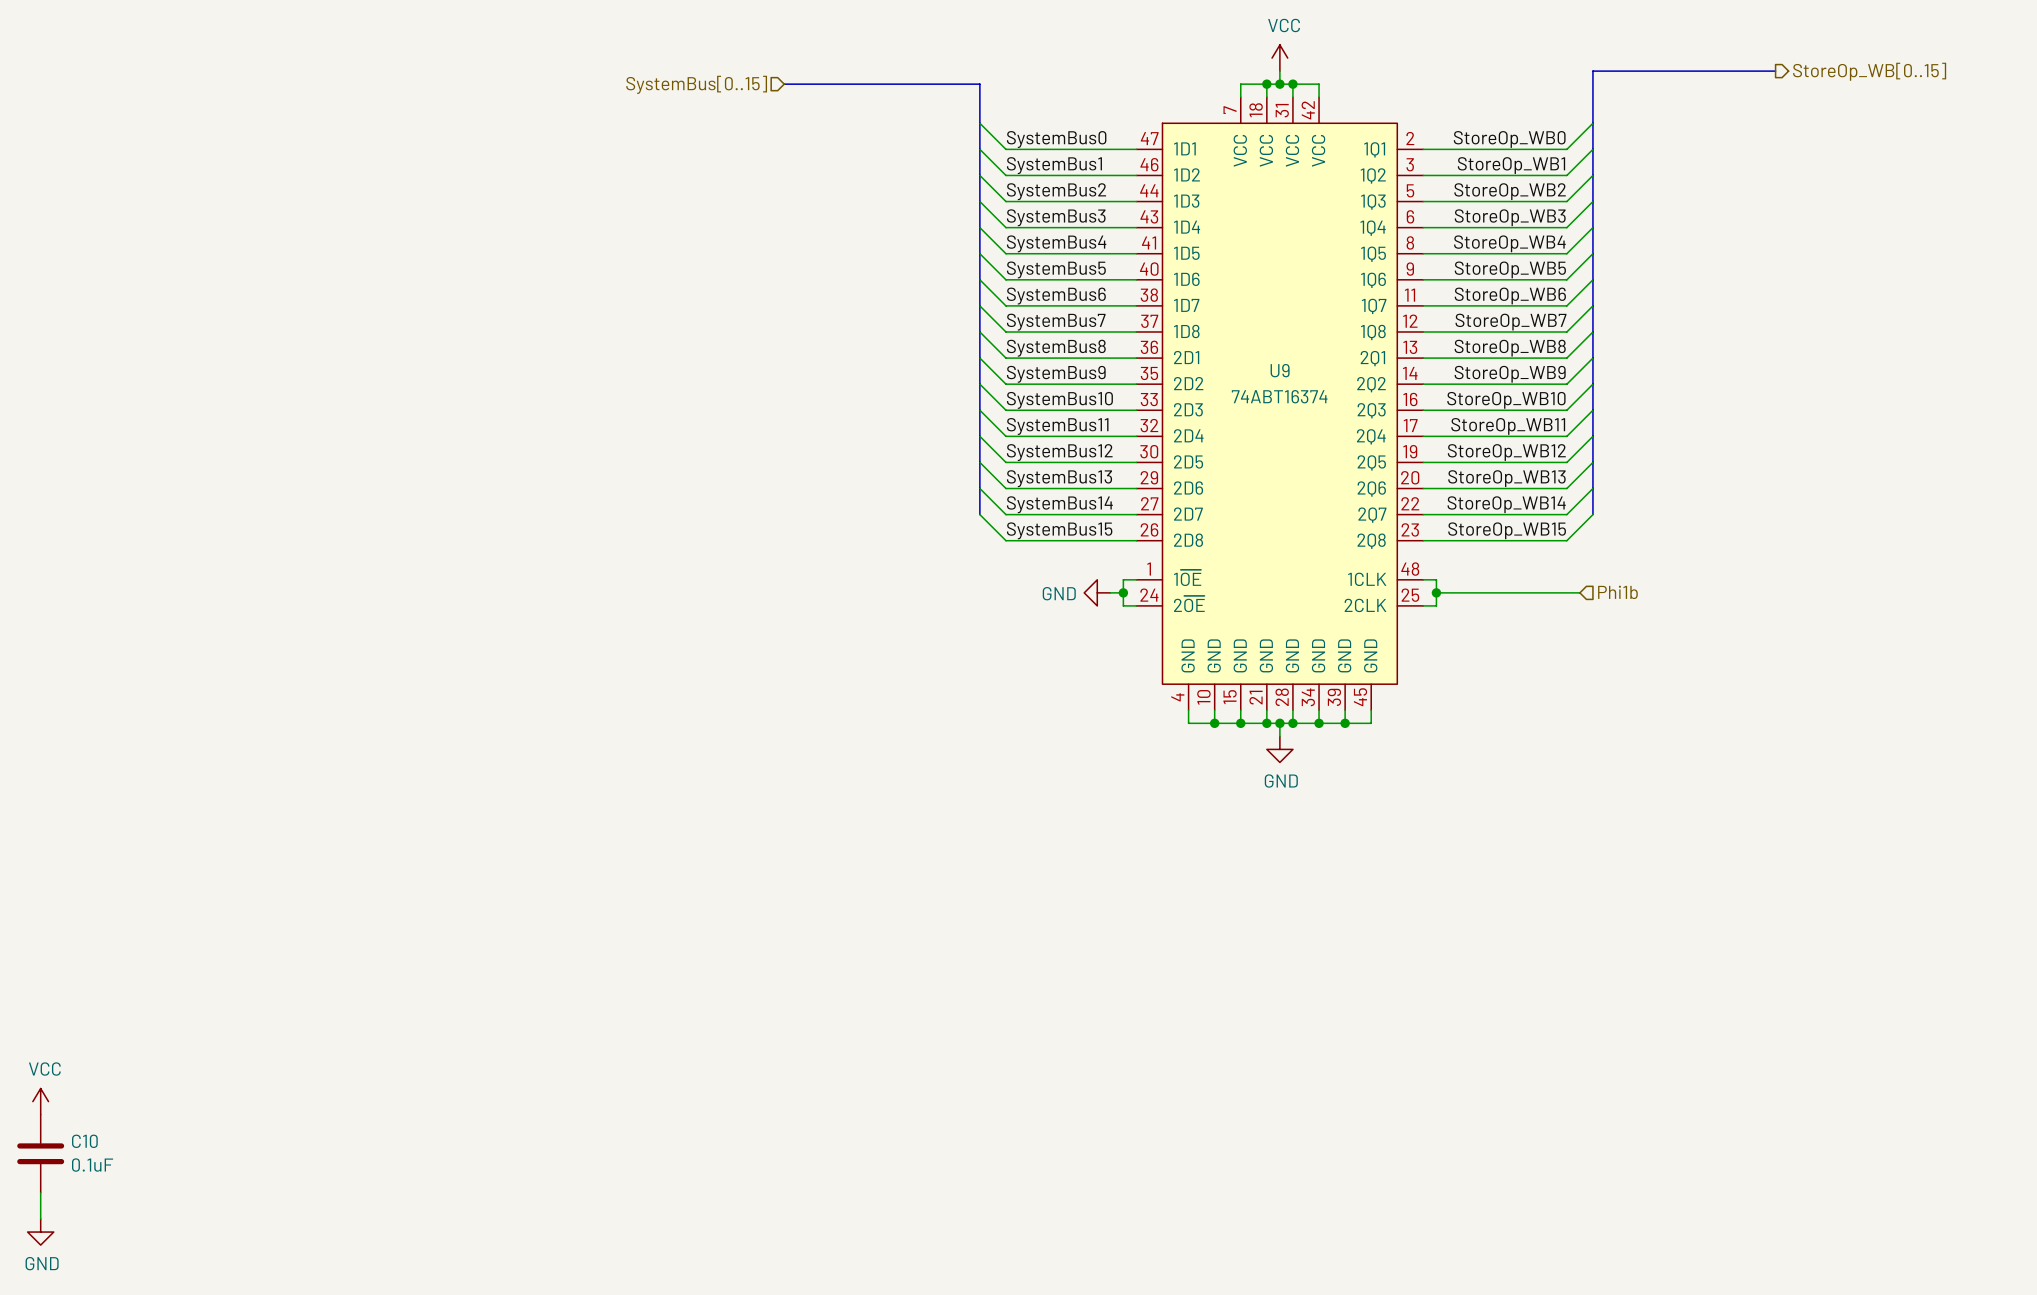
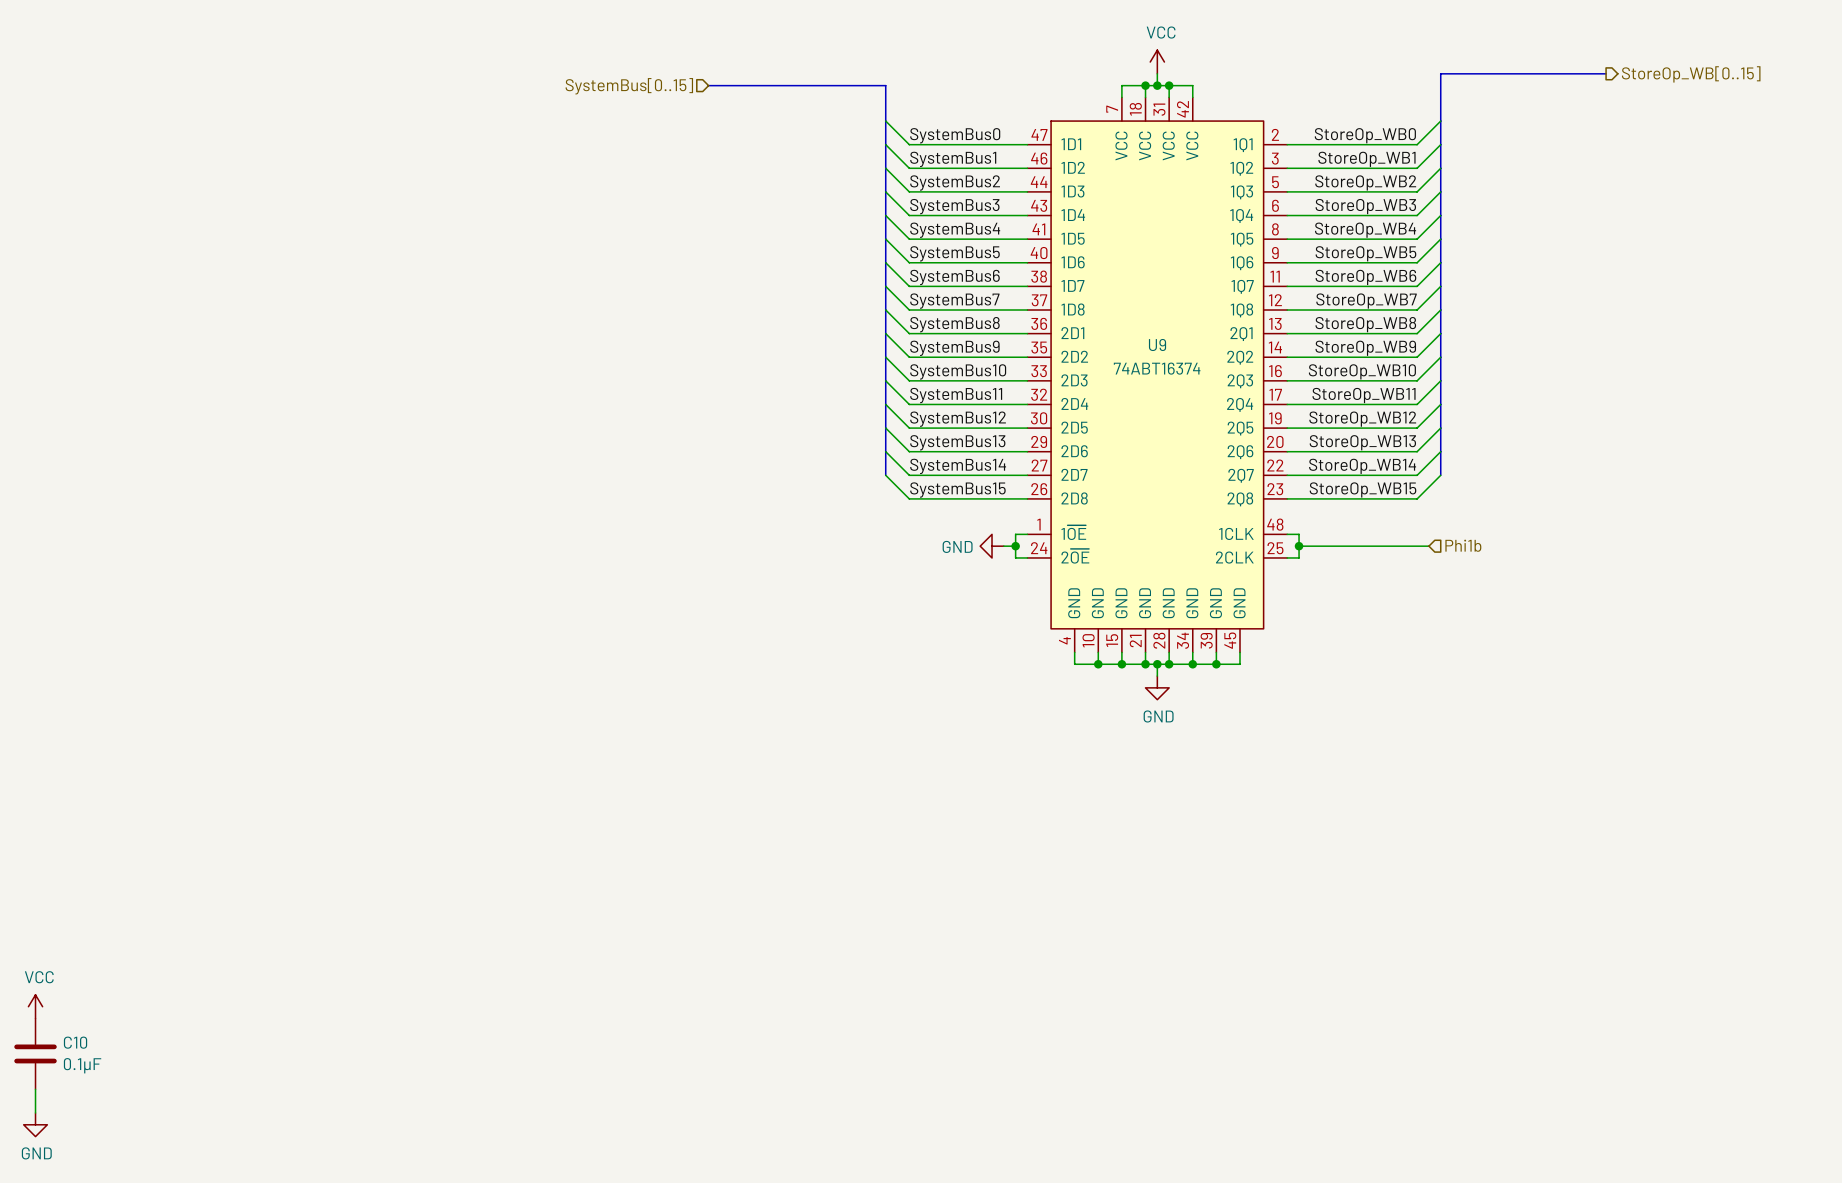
C10 value: 0.1uF (92, 1165) -> 0.1μF (82, 1065)

